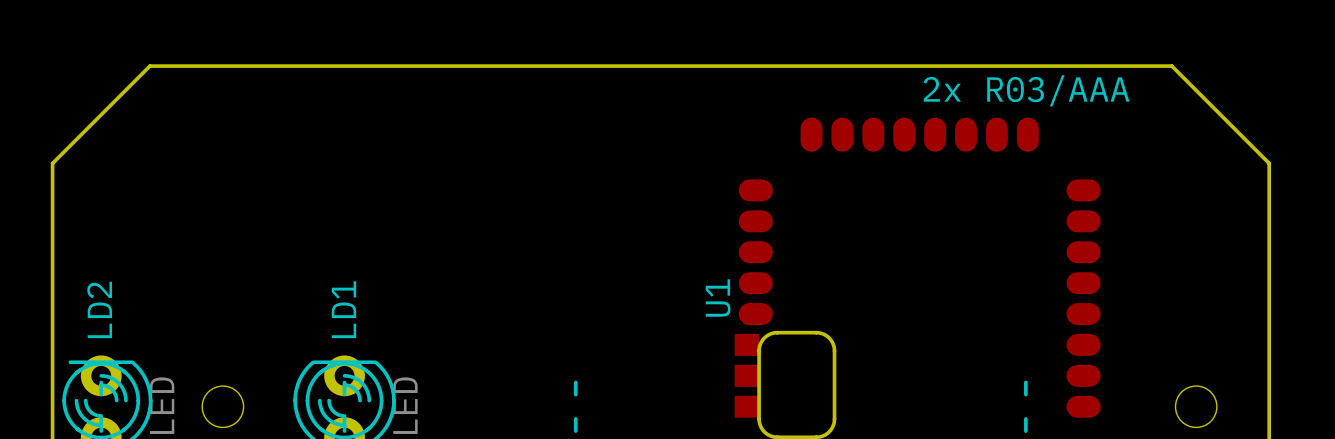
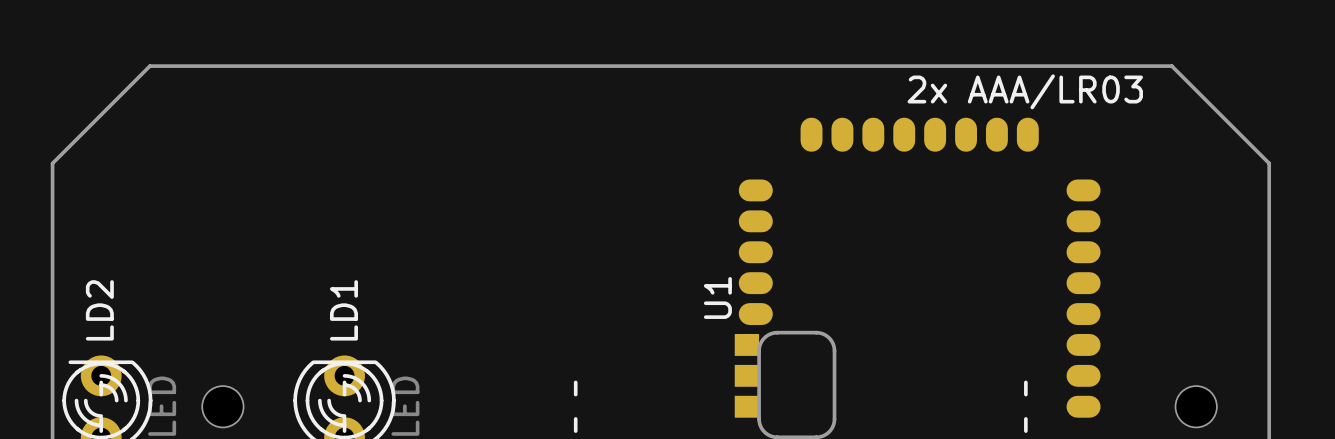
part value: 2x R03/AAA (1026, 90) -> 2x AAA/LR03 (1025, 91)

